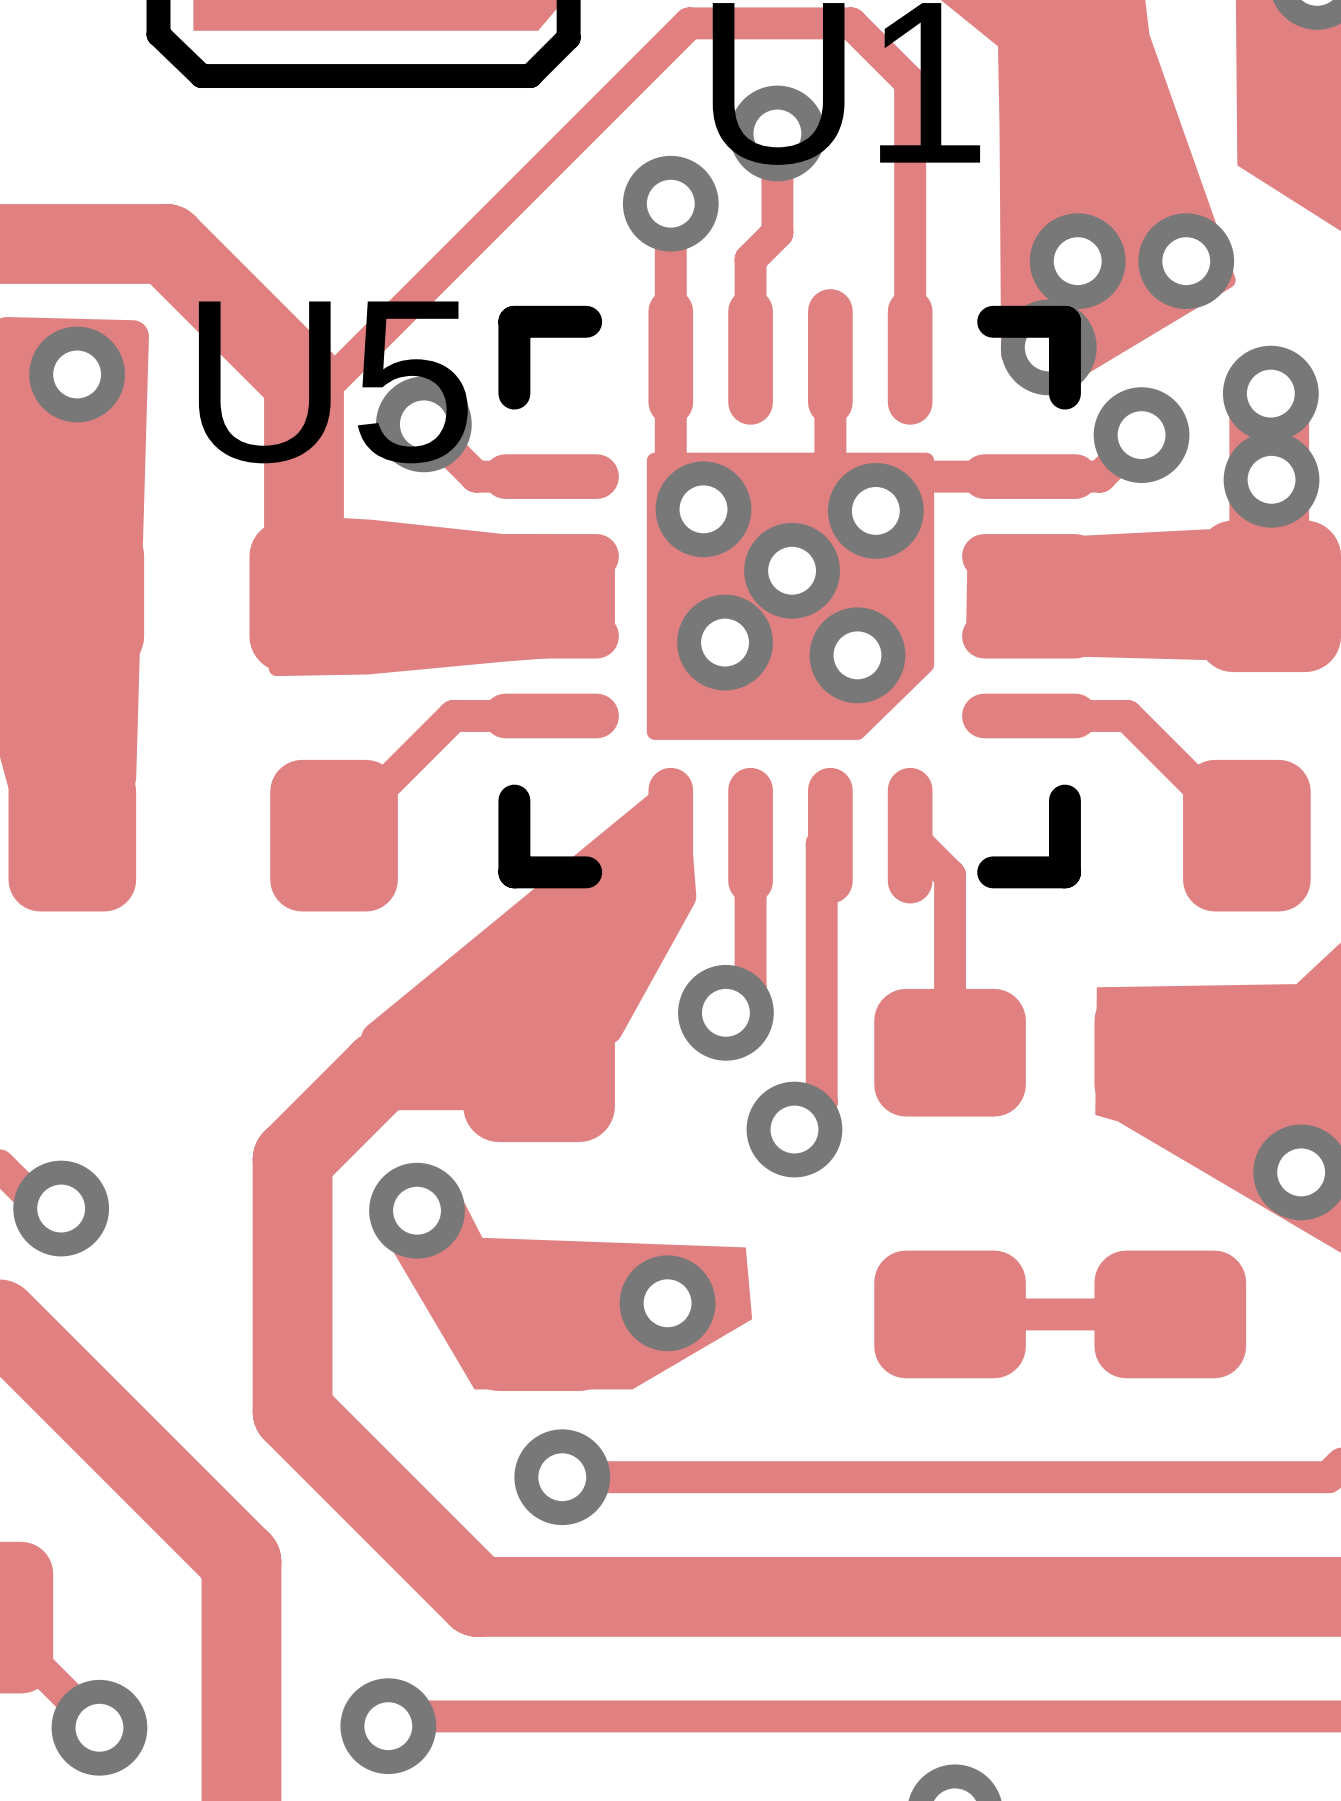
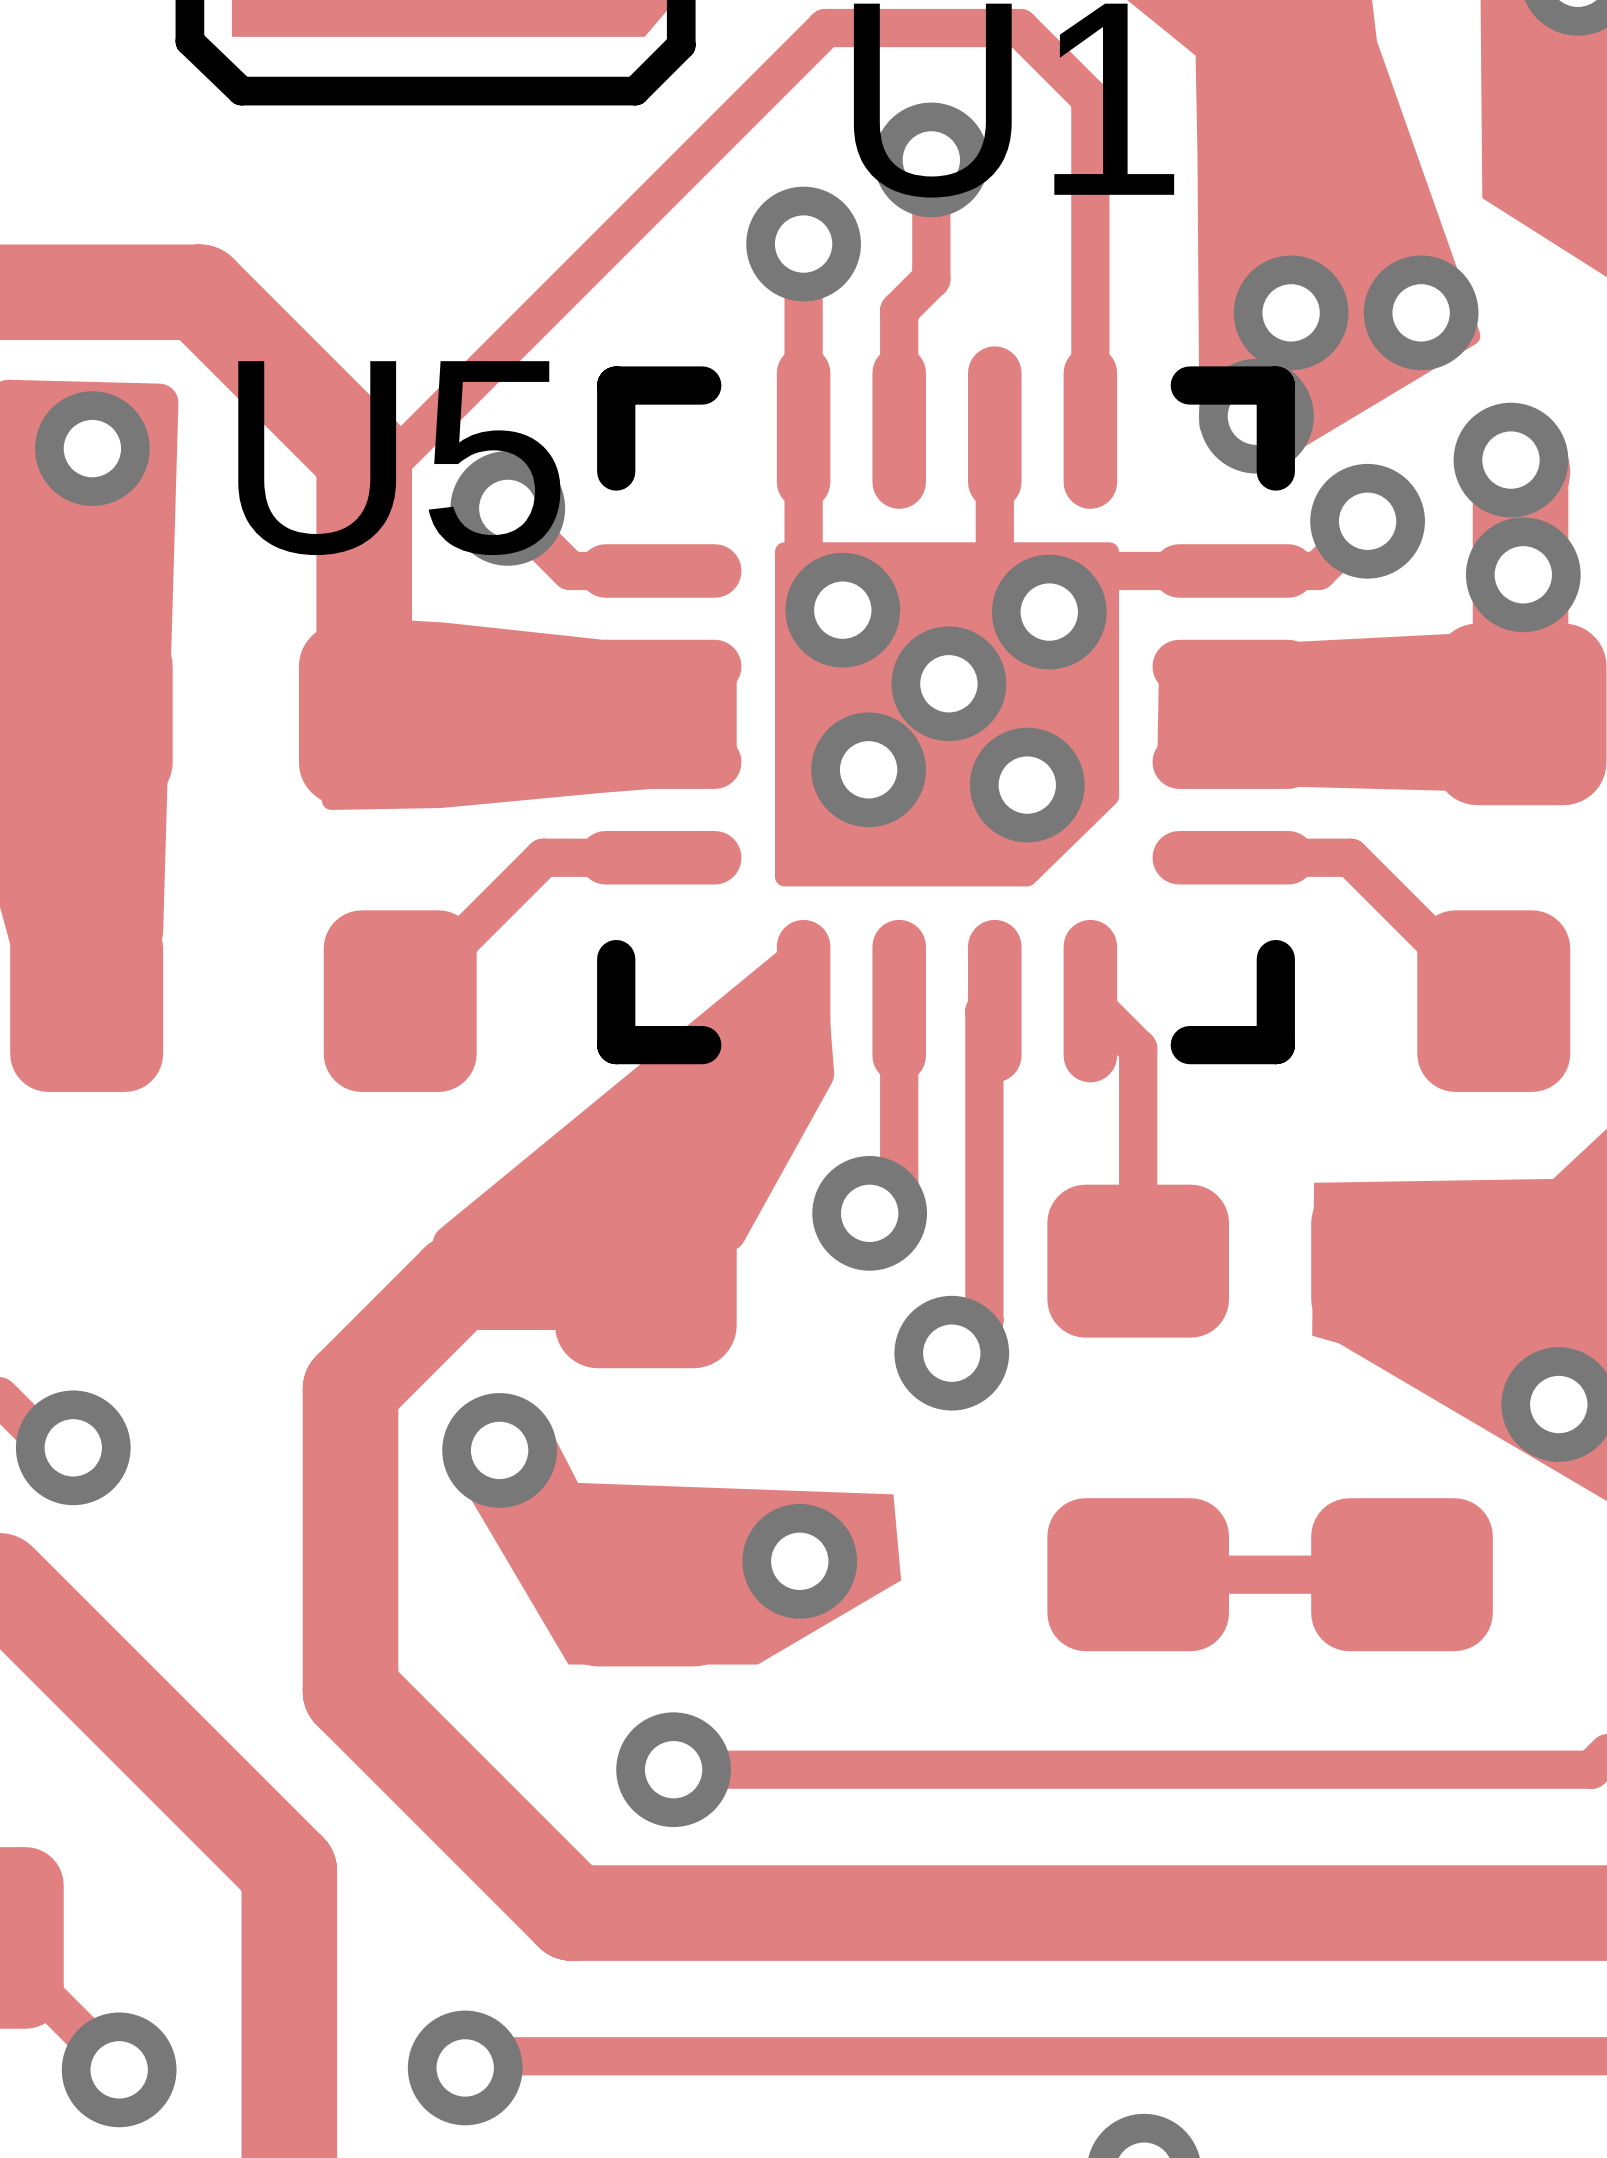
via position: (1270, 393) -> (1510, 460)

